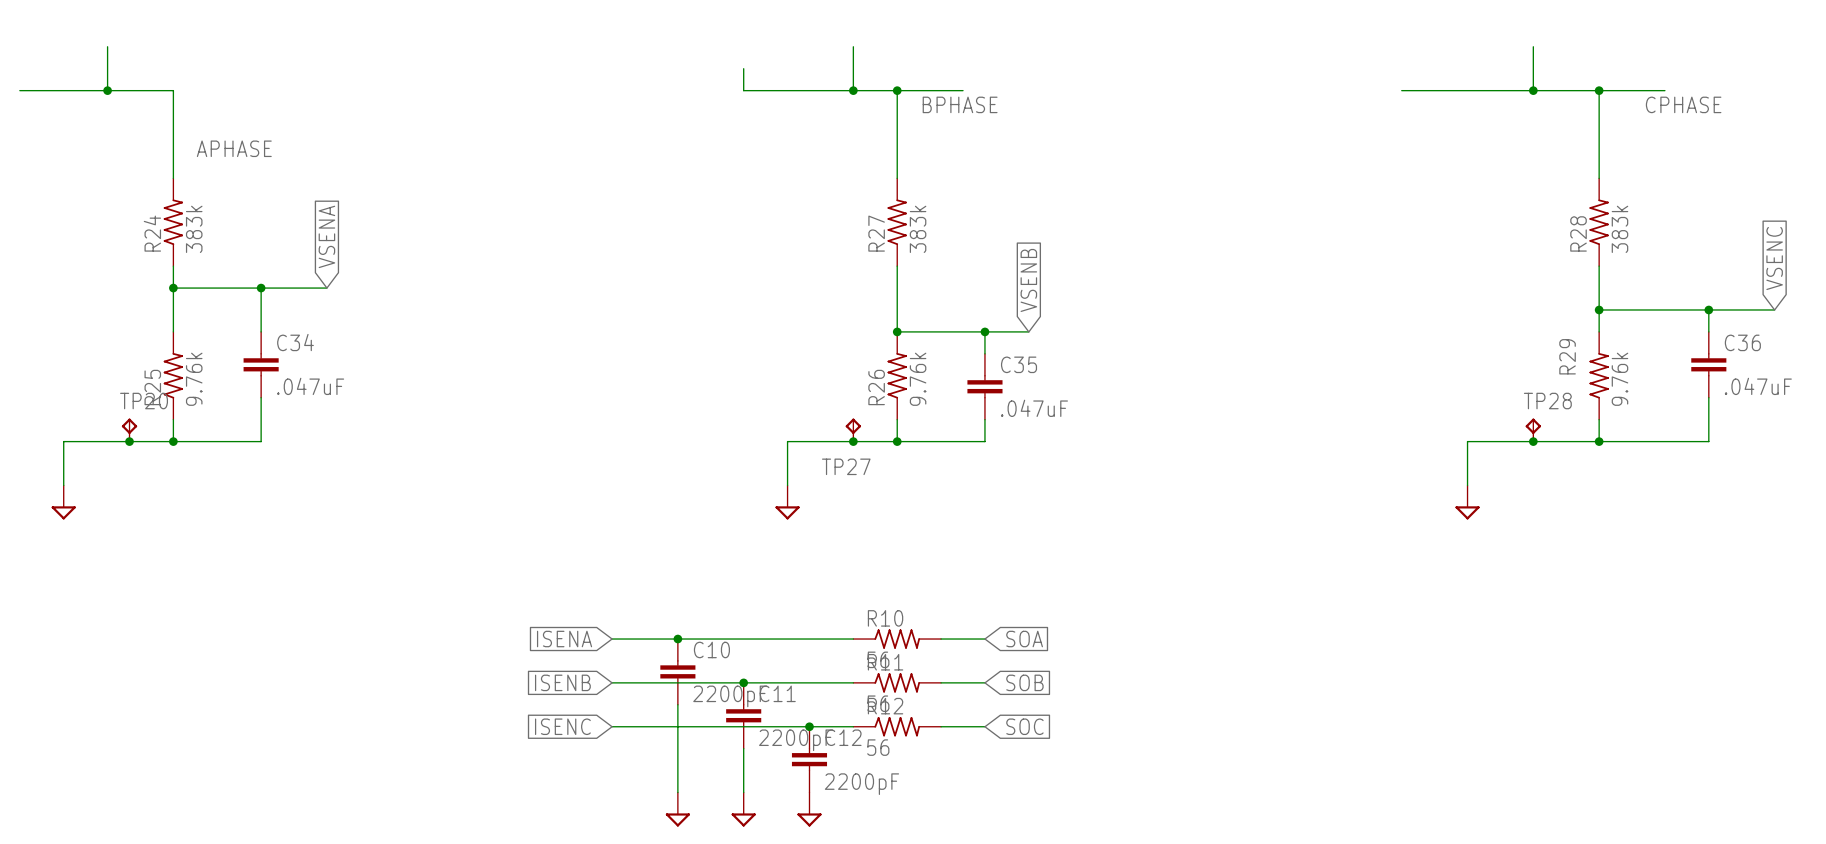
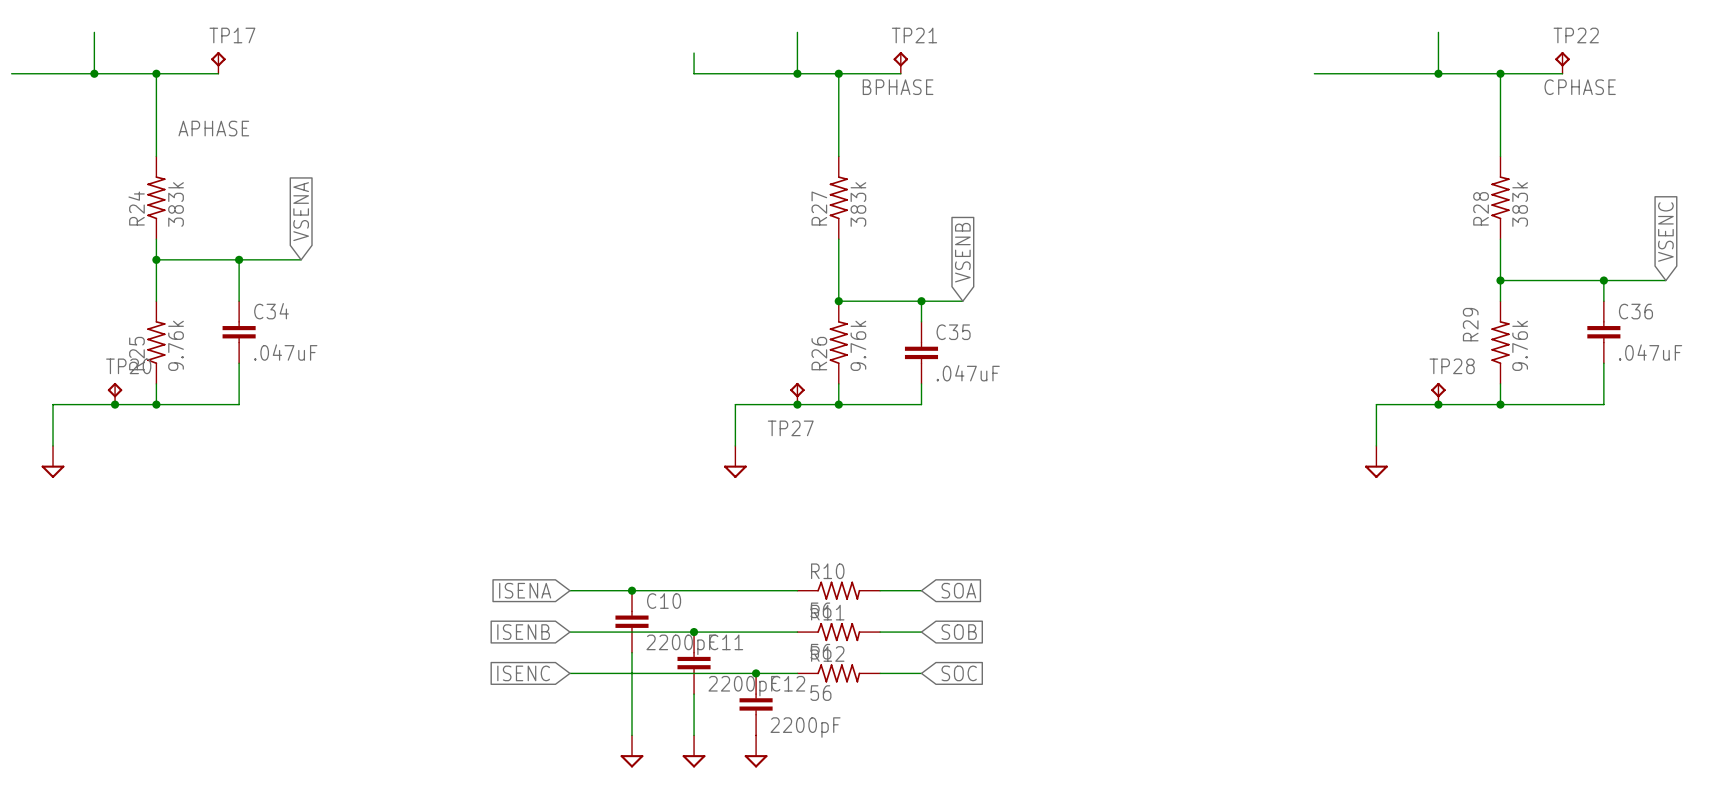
TP17: none -> (218, 62)
TP21: none -> (900, 62)
TP22: none -> (1562, 62)
wire: none -> (156, 73) (218, 73)
junction: none -> (156, 73)

